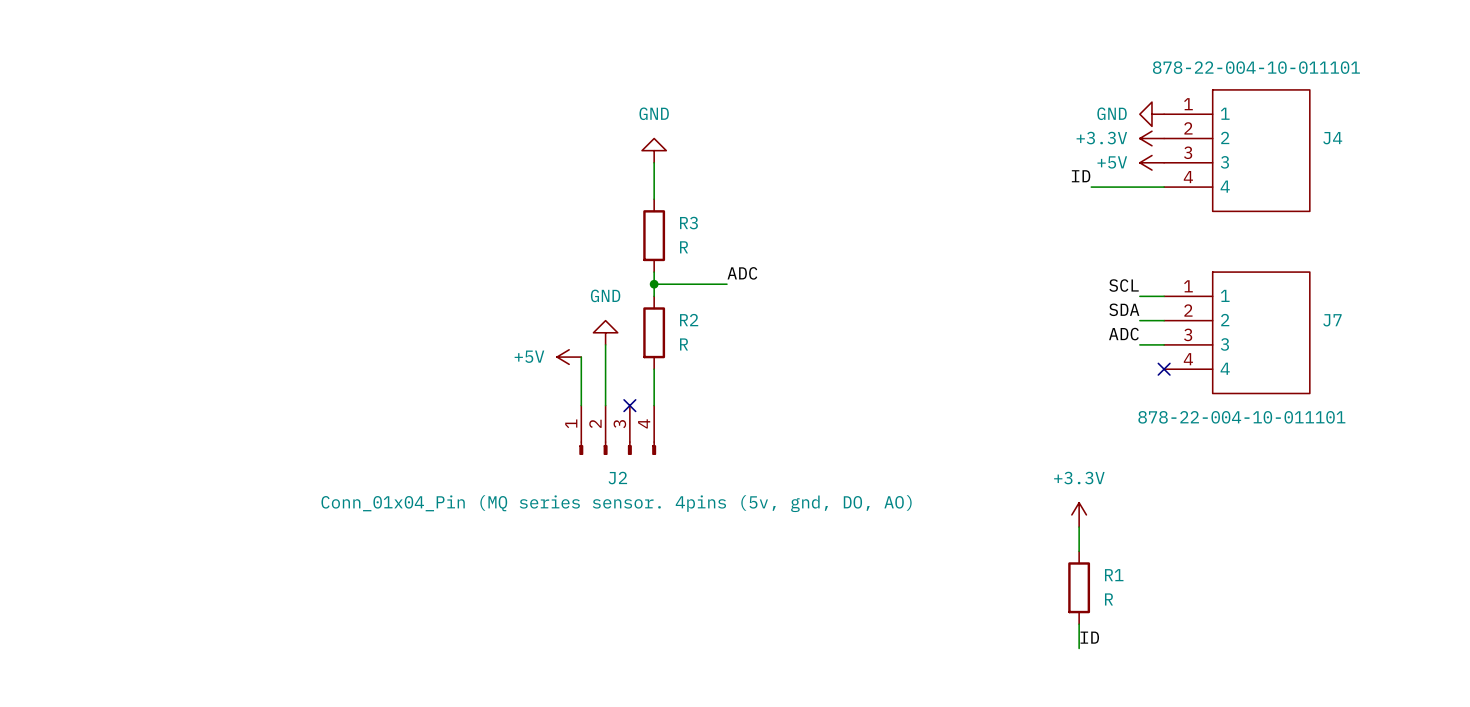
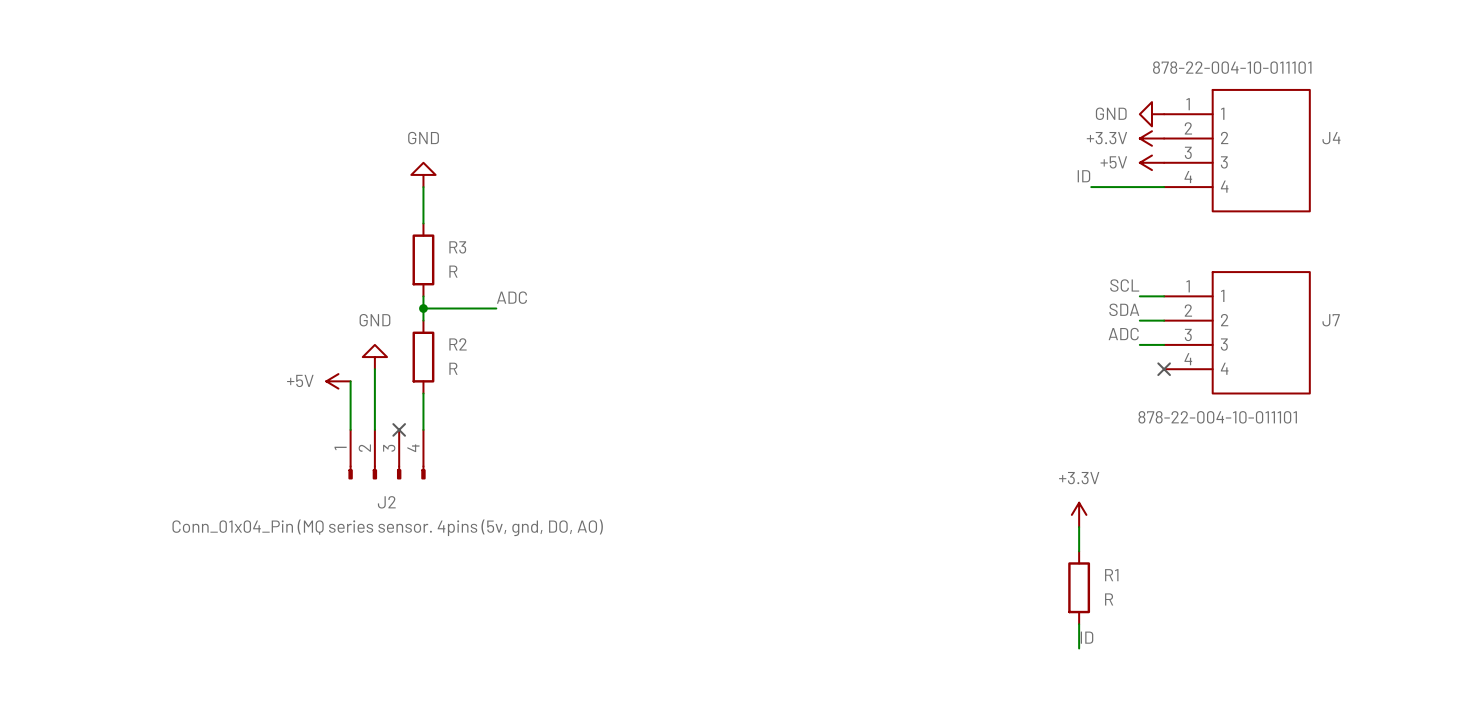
power symbol: GND (654, 150) -> none
wire: (654, 162) (654, 199) -> (423, 187) (423, 223)
power symbol: none -> GND (423, 174)
R3 position: (654, 235) -> (423, 259)
wire: (654, 272) (654, 296) -> (423, 296) (423, 320)
label position: ADC (742, 273) -> ADC (511, 297)
wire: (654, 284) (727, 284) -> (423, 308) (496, 308)
junction: (654, 284) -> none
junction: none -> (423, 308)
power symbol: GND (605, 332) -> none
R2 position: (654, 332) -> (423, 357)
wire: (605, 344) (605, 405) -> (374, 369) (374, 429)
power symbol: none -> GND (374, 357)
power symbol position: +5V (569, 357) -> +5V (338, 381)
wire: (581, 357) (581, 405) -> (350, 381) (350, 429)
wire: (654, 369) (654, 405) -> (423, 393) (423, 429)
no-connect mark: (629, 405) -> none
no-connect mark: none -> (399, 429)
J2 position: (617, 430) -> (387, 454)

